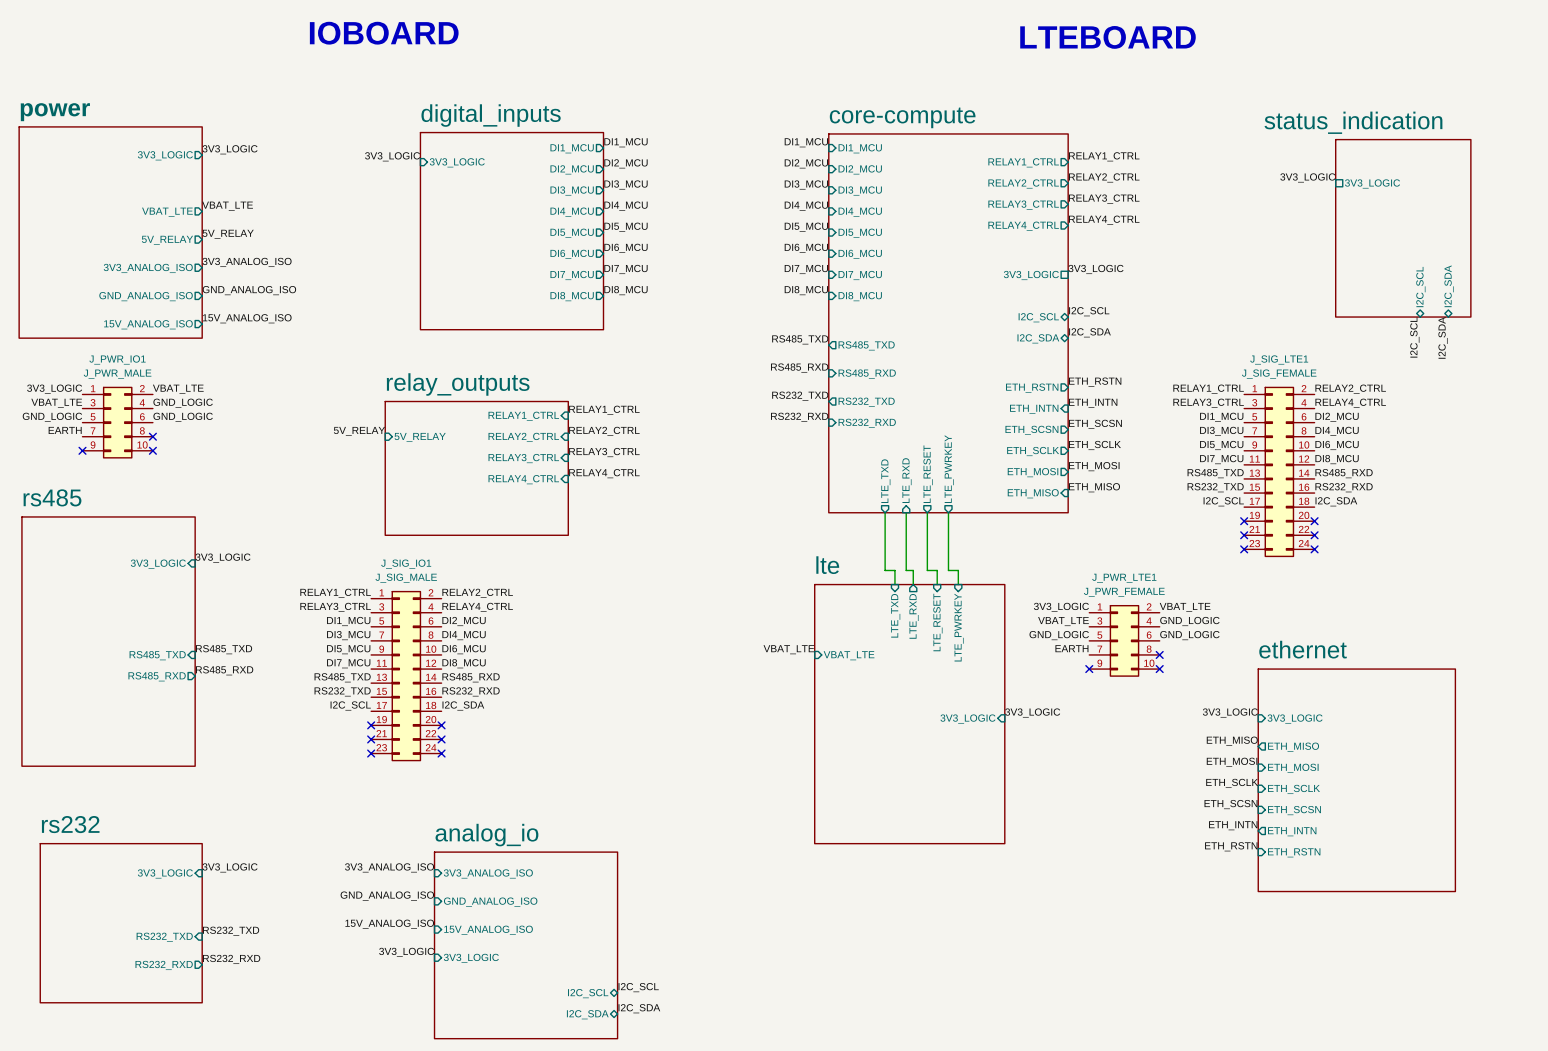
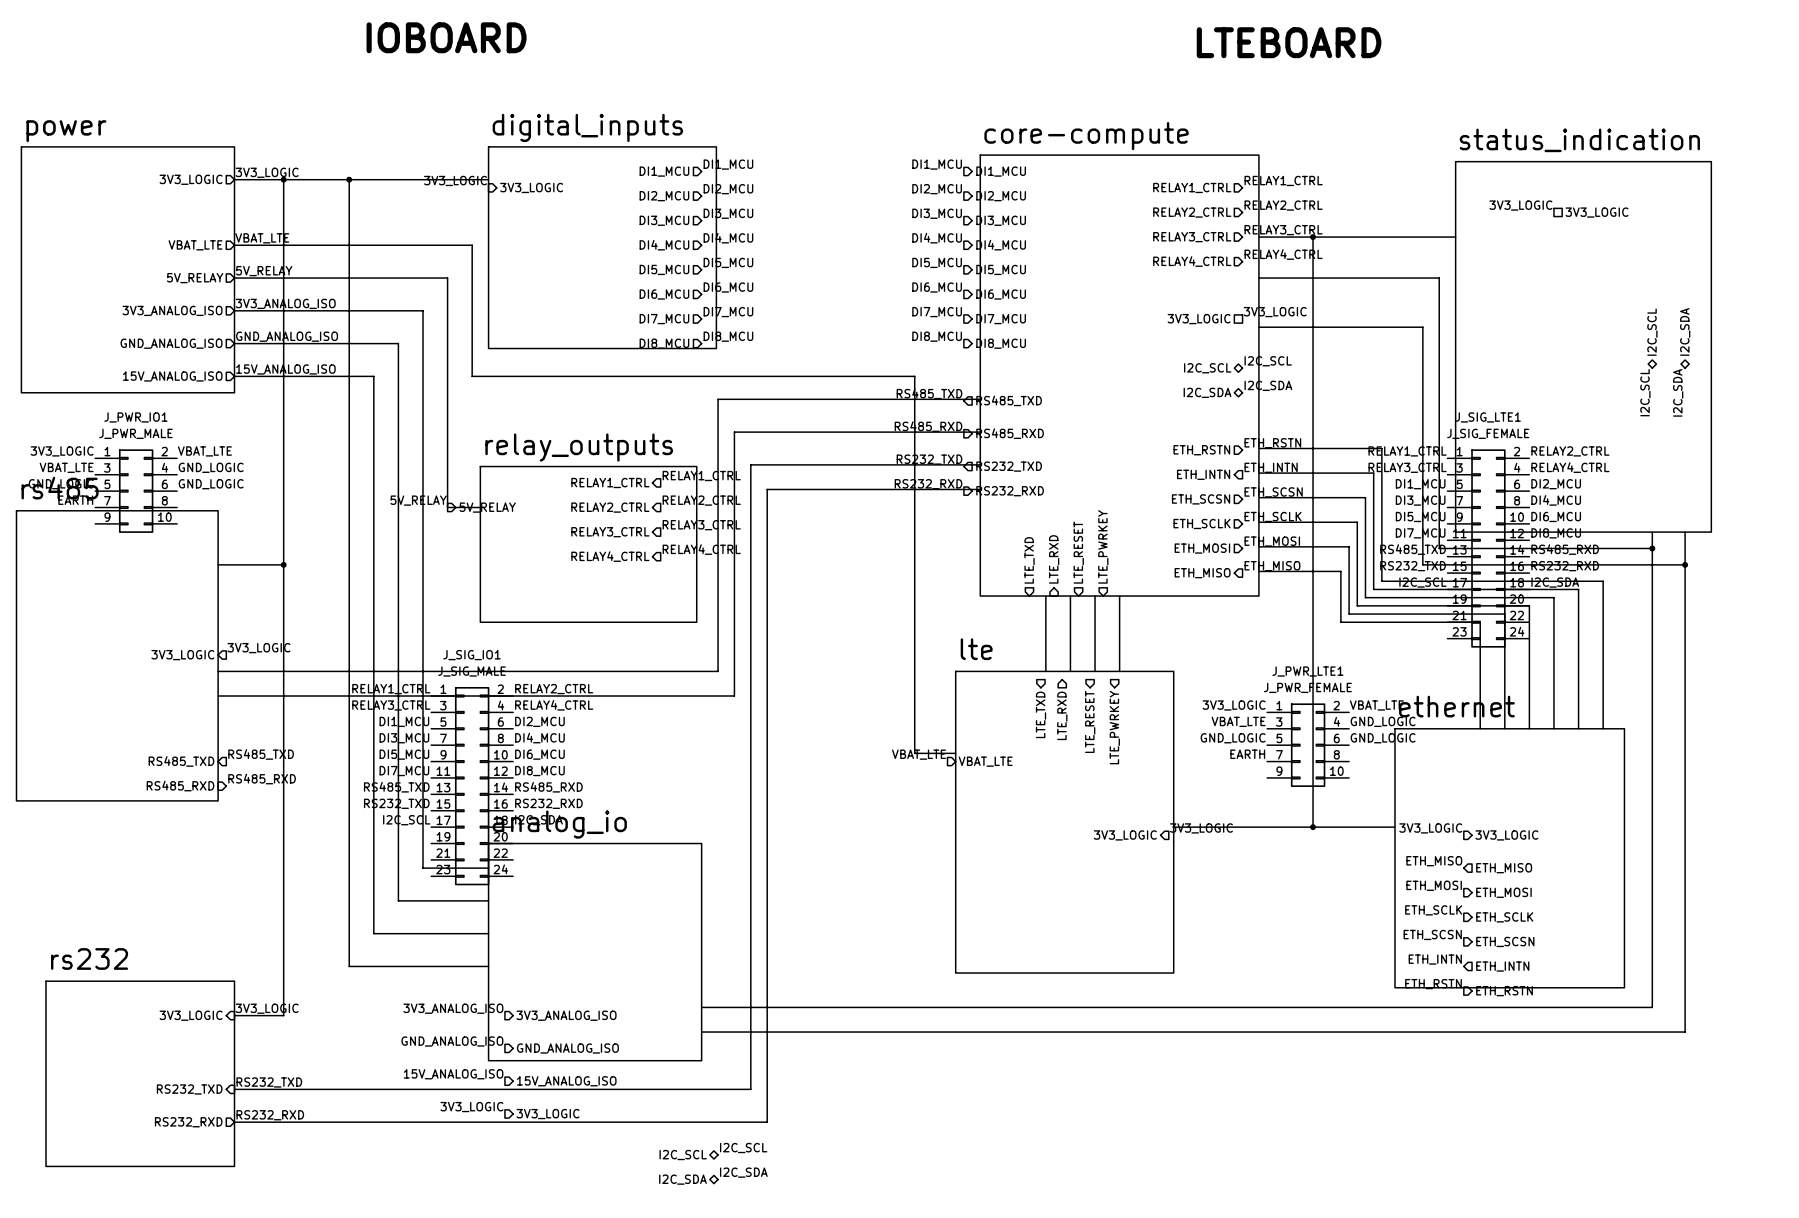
wire: none -> (234, 179) (488, 179)
wire: none -> (283, 179) (283, 1015) (234, 1015)
junction: none -> (283, 179)
wire: none -> (349, 179) (349, 966) (488, 966)
junction: none -> (349, 179)
wire: none -> (1258, 237) (1455, 237)
wire: none -> (1313, 237) (1313, 827)
junction: none -> (1313, 237)
wire: none -> (234, 245) (472, 245) (472, 376) (914, 376) (914, 753) (955, 753)
sheet digital_inputs: none -> (602, 247)
sheet status_indication: (1403, 228) -> none
sheet digital_inputs: (511, 231) -> none
wire: none -> (234, 278) (447, 278) (447, 507) (480, 507)
wire: none -> (1258, 278) (1439, 278) (1439, 548) (1652, 548)
wire: none -> (234, 310) (422, 310) (422, 868) (488, 868)
wire: none -> (1258, 327) (1422, 327) (1422, 564) (1685, 564)
wire: none -> (234, 343) (398, 343) (398, 900) (488, 900)
sheet status_indication: none -> (1583, 346)
sheet core-compute position: (948, 323) -> (1119, 375)
wire: none -> (234, 376) (373, 376) (373, 933) (488, 933)
wire: none -> (980, 399) (718, 399) (718, 671) (218, 671)
wire: none -> (980, 432) (734, 432) (734, 696) (218, 696)
wire: none -> (1258, 448) (1381, 448) (1381, 581) (1603, 581) (1603, 728)
wire: none -> (980, 464) (750, 464) (750, 1089) (234, 1089)
wire: none -> (1258, 473) (1373, 473) (1373, 589) (1578, 589) (1578, 728)
wire: none -> (980, 489) (767, 489) (767, 1122) (234, 1122)
wire: none -> (1258, 497) (1365, 497) (1365, 597) (1553, 597) (1553, 728)
no-connect mark: (152, 436) -> none
wire: none -> (1258, 522) (1357, 522) (1357, 605) (1529, 605) (1529, 728)
no-connect mark: (82, 450) -> none
no-connect mark: (152, 450) -> none
wire: none -> (1652, 532) (1652, 1007) (701, 1007)
wire: none -> (1685, 532) (1685, 1032) (701, 1032)
sheet relay_outputs: (476, 468) -> none
sheet relay_outputs: none -> (588, 544)
wire: none -> (1258, 546) (1349, 546) (1349, 614) (1504, 614) (1504, 728)
junction: none -> (1652, 548)
wire: none -> (218, 564) (283, 564)
junction: none -> (283, 564)
junction: none -> (1685, 564)
wire: none -> (1258, 571) (1340, 571) (1340, 622) (1480, 622) (1480, 728)
wire: (885, 512) (885, 570) (894, 570) (894, 584) -> none
wire: none -> (1045, 596) (1045, 671)
wire: (906, 512) (906, 570) (913, 570) (913, 584) -> none
wire: none -> (1070, 596) (1070, 671)
wire: (927, 512) (927, 570) (937, 570) (937, 584) -> none
wire: none -> (1095, 596) (1095, 671)
wire: (948, 512) (948, 570) (958, 570) (958, 584) -> none
wire: none -> (1119, 596) (1119, 671)
no-connect mark: (1244, 521) -> none
no-connect mark: (1314, 521) -> none
no-connect mark: (1244, 535) -> none
no-connect mark: (1314, 535) -> none
no-connect mark: (1244, 549) -> none
no-connect mark: (1314, 549) -> none
sheet rs485 position: (108, 641) -> (117, 655)
no-connect mark: (1159, 654) -> none
no-connect mark: (1089, 669) -> none
no-connect mark: (1159, 669) -> none
sheet lte: none -> (1064, 822)
wire: none -> (1173, 827) (1394, 827)
junction: none -> (1313, 827)
sheet lte: (909, 714) -> none
no-connect mark: (371, 725) -> none
no-connect mark: (441, 725) -> none
no-connect mark: (371, 739) -> none
no-connect mark: (441, 739) -> none
no-connect mark: (371, 753) -> none
no-connect mark: (441, 753) -> none
sheet ethernet position: (1356, 780) -> (1509, 858)
sheet analog_io position: (526, 945) -> (595, 952)

